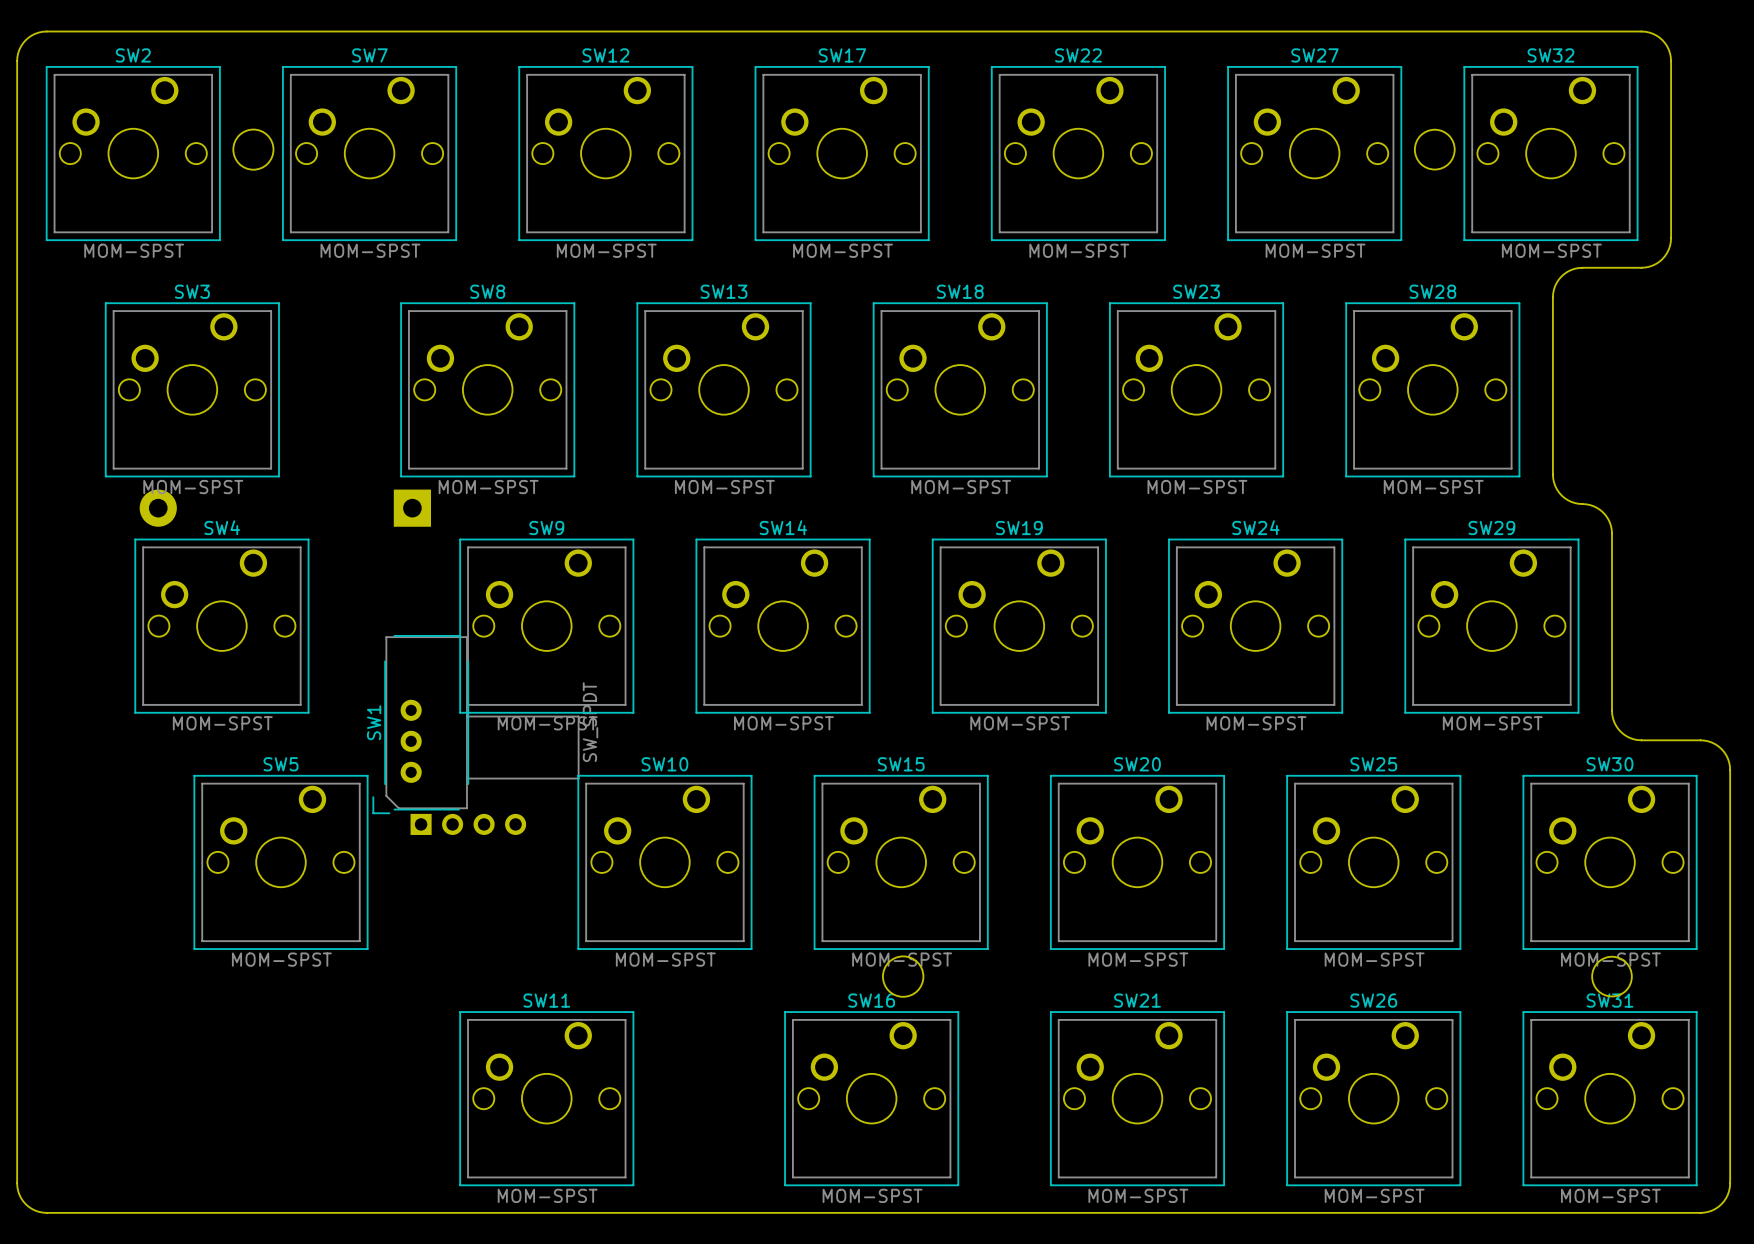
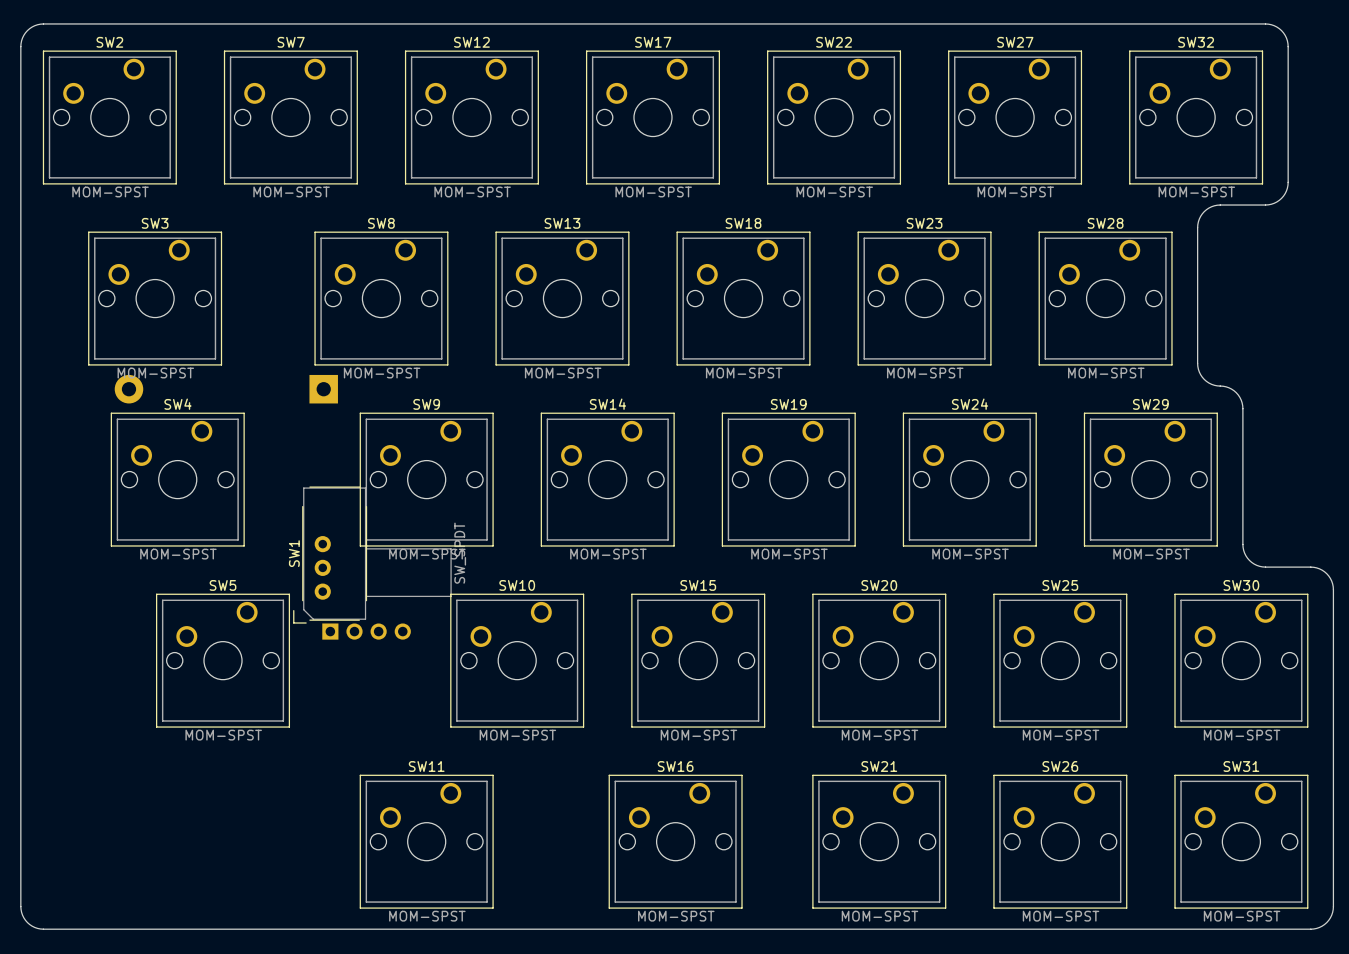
round board edge: [232, 128, 275, 171] -> none
round board edge: [1414, 129, 1456, 171] -> none
round board edge: [882, 955, 925, 998] -> none
round board edge: [1591, 956, 1633, 998] -> none

